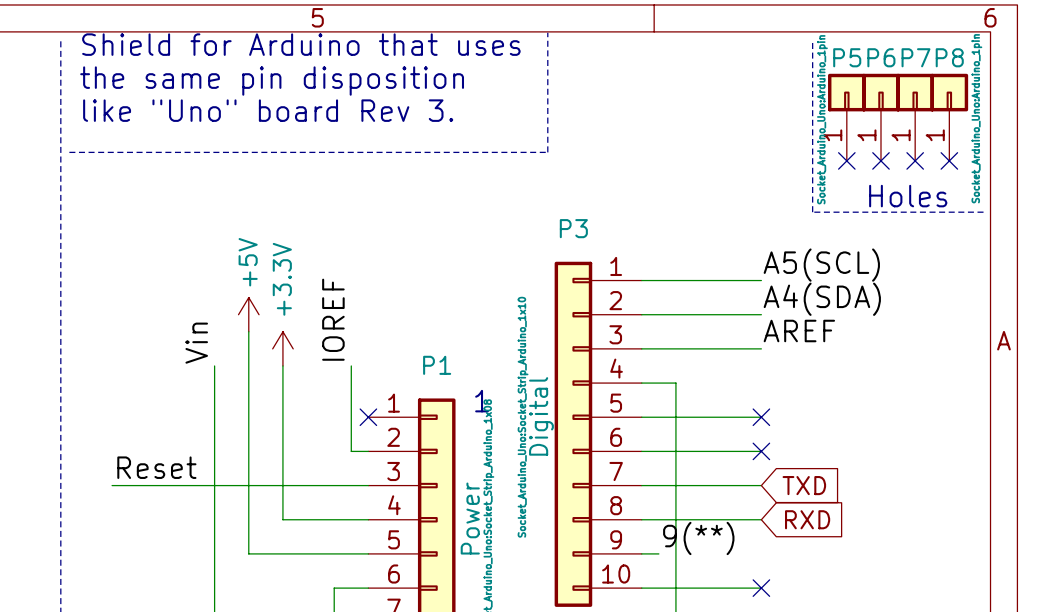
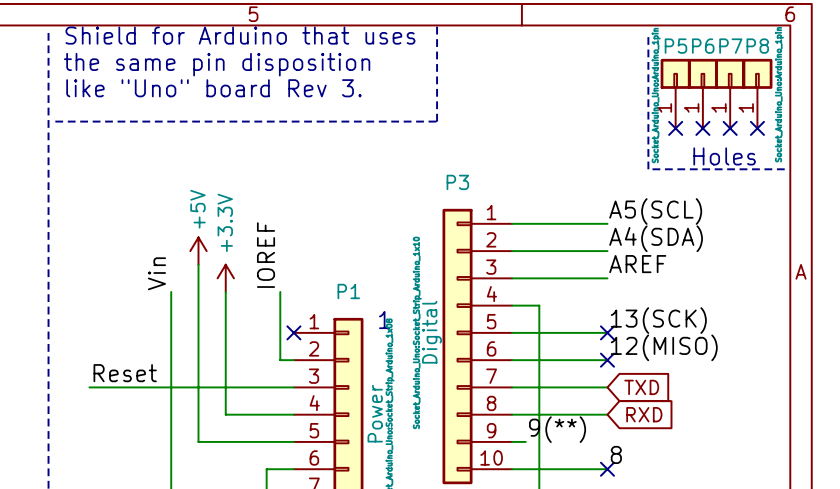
label: none -> 13(SCK) (658, 320)
label: none -> 12(MISO) (664, 347)
label: none -> 8 (616, 454)

